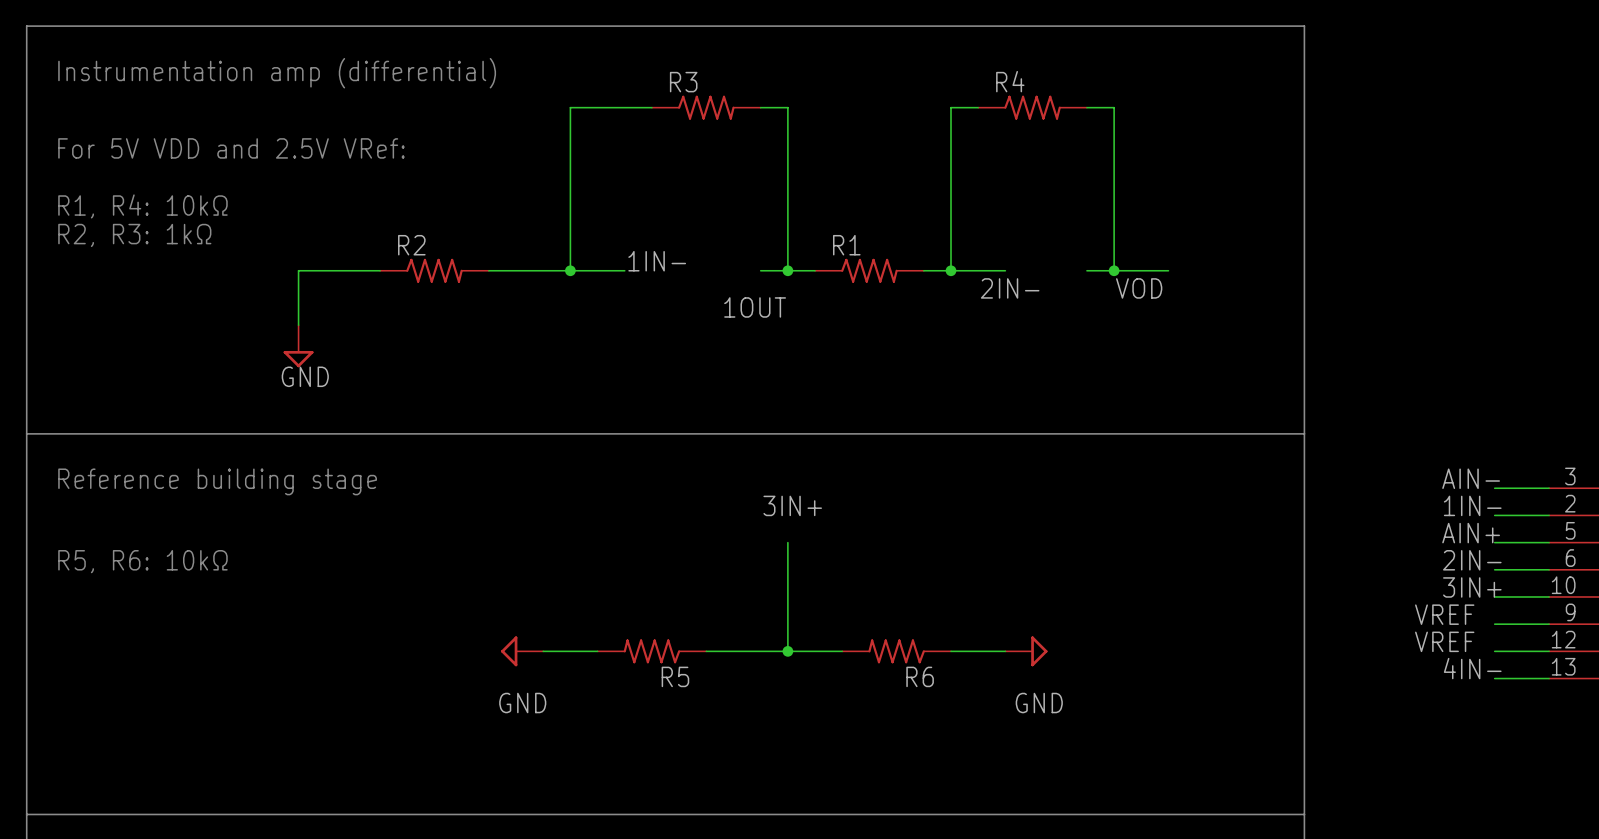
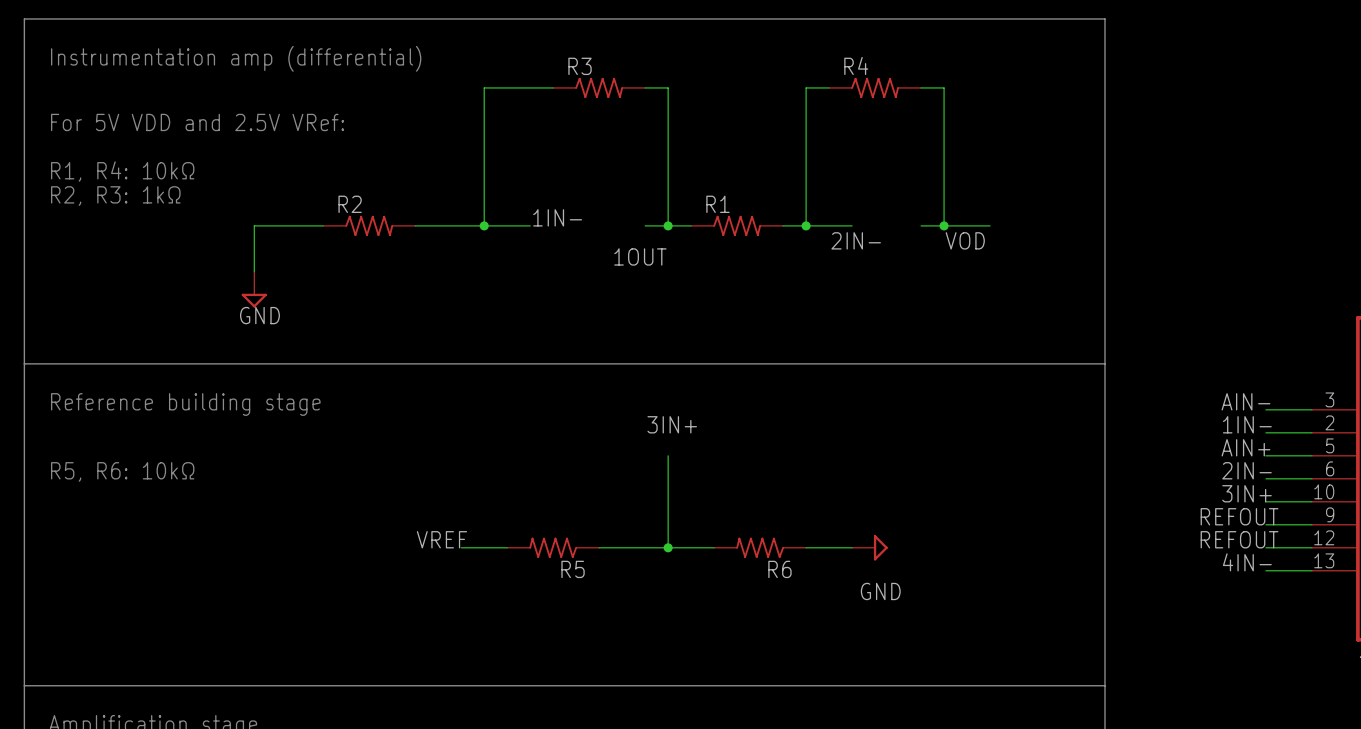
label: VREF (1444, 614) -> REFOUT (1239, 516)
label: none -> VREF (441, 539)
label: VREF (1444, 641) -> REFOUT (1239, 539)
power symbol: GND (522, 651) -> none

